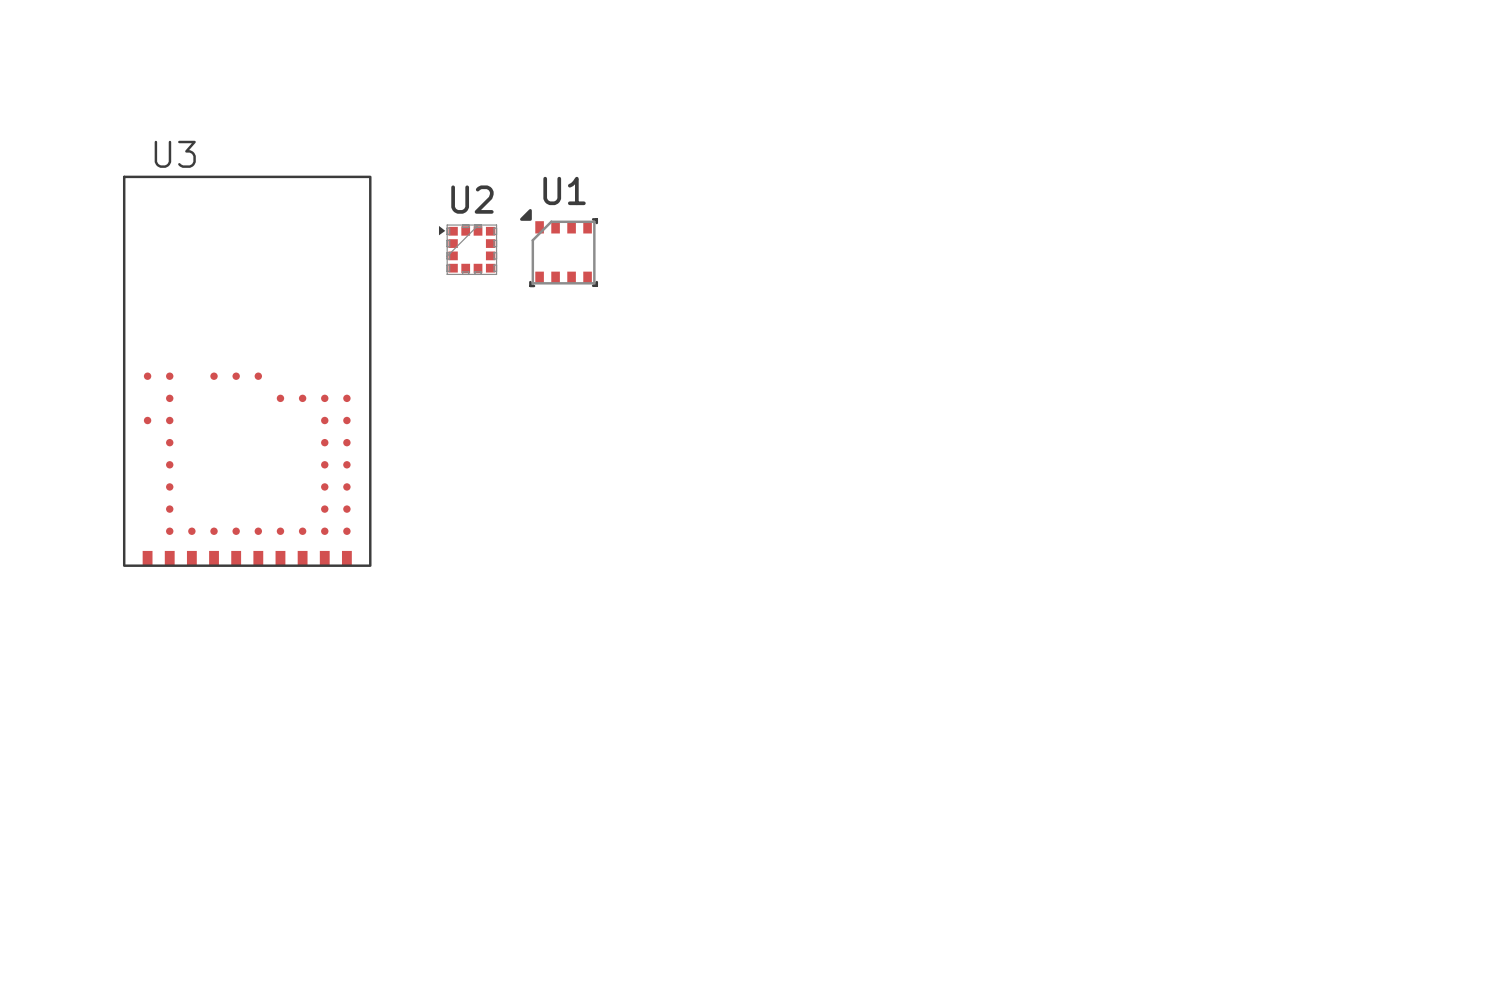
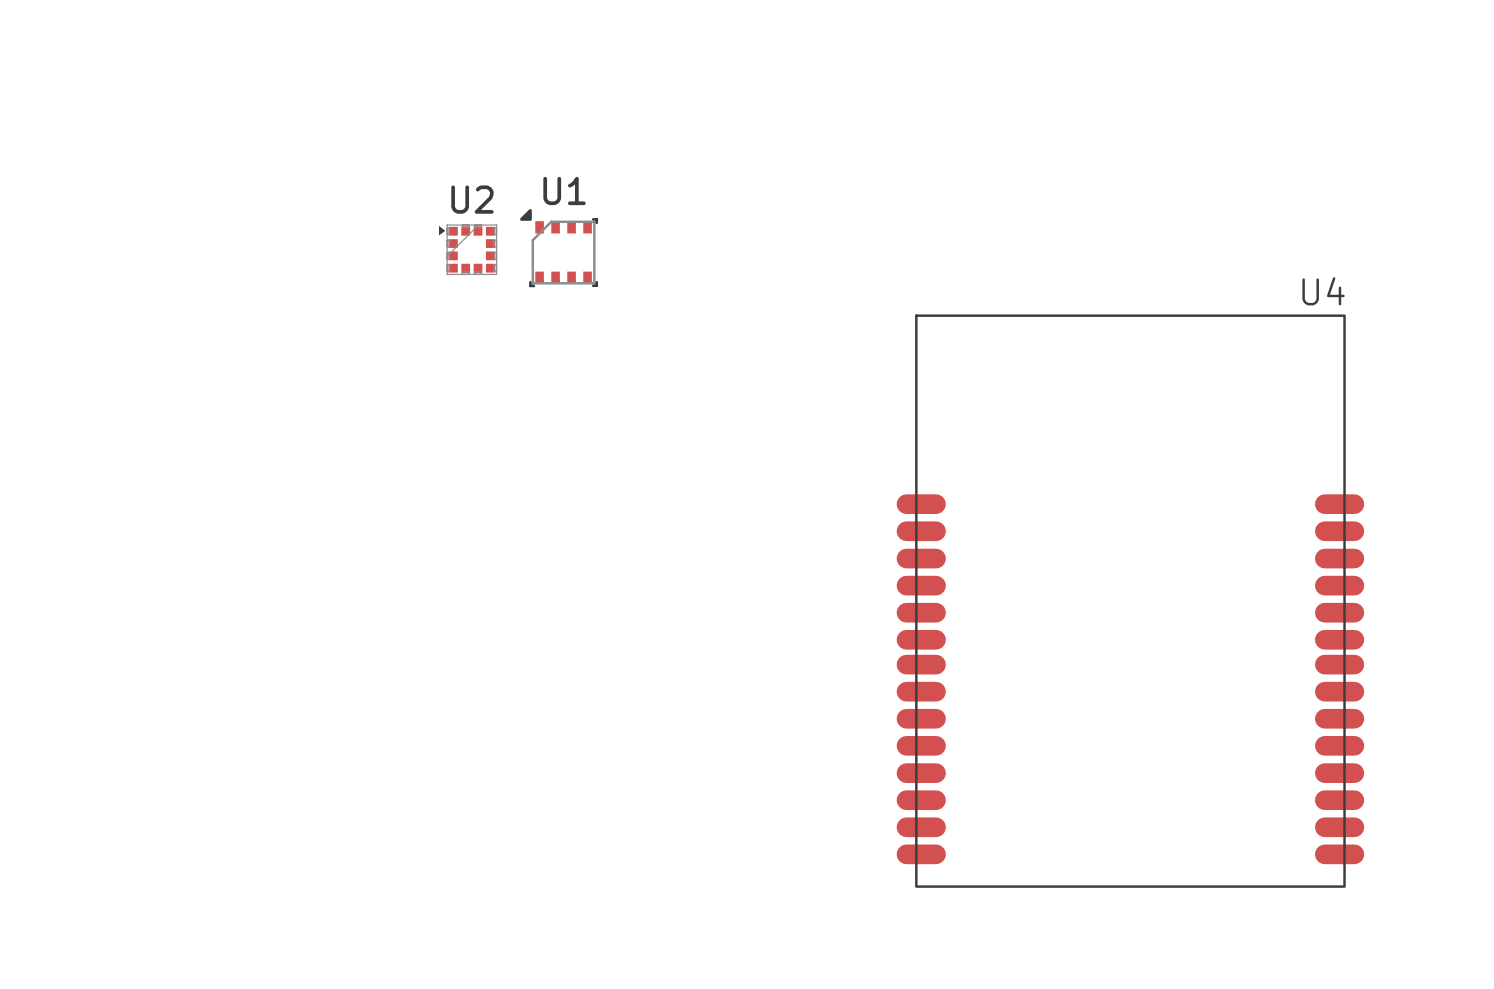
U3: (247, 371) -> none
U4: none -> (1130, 601)

